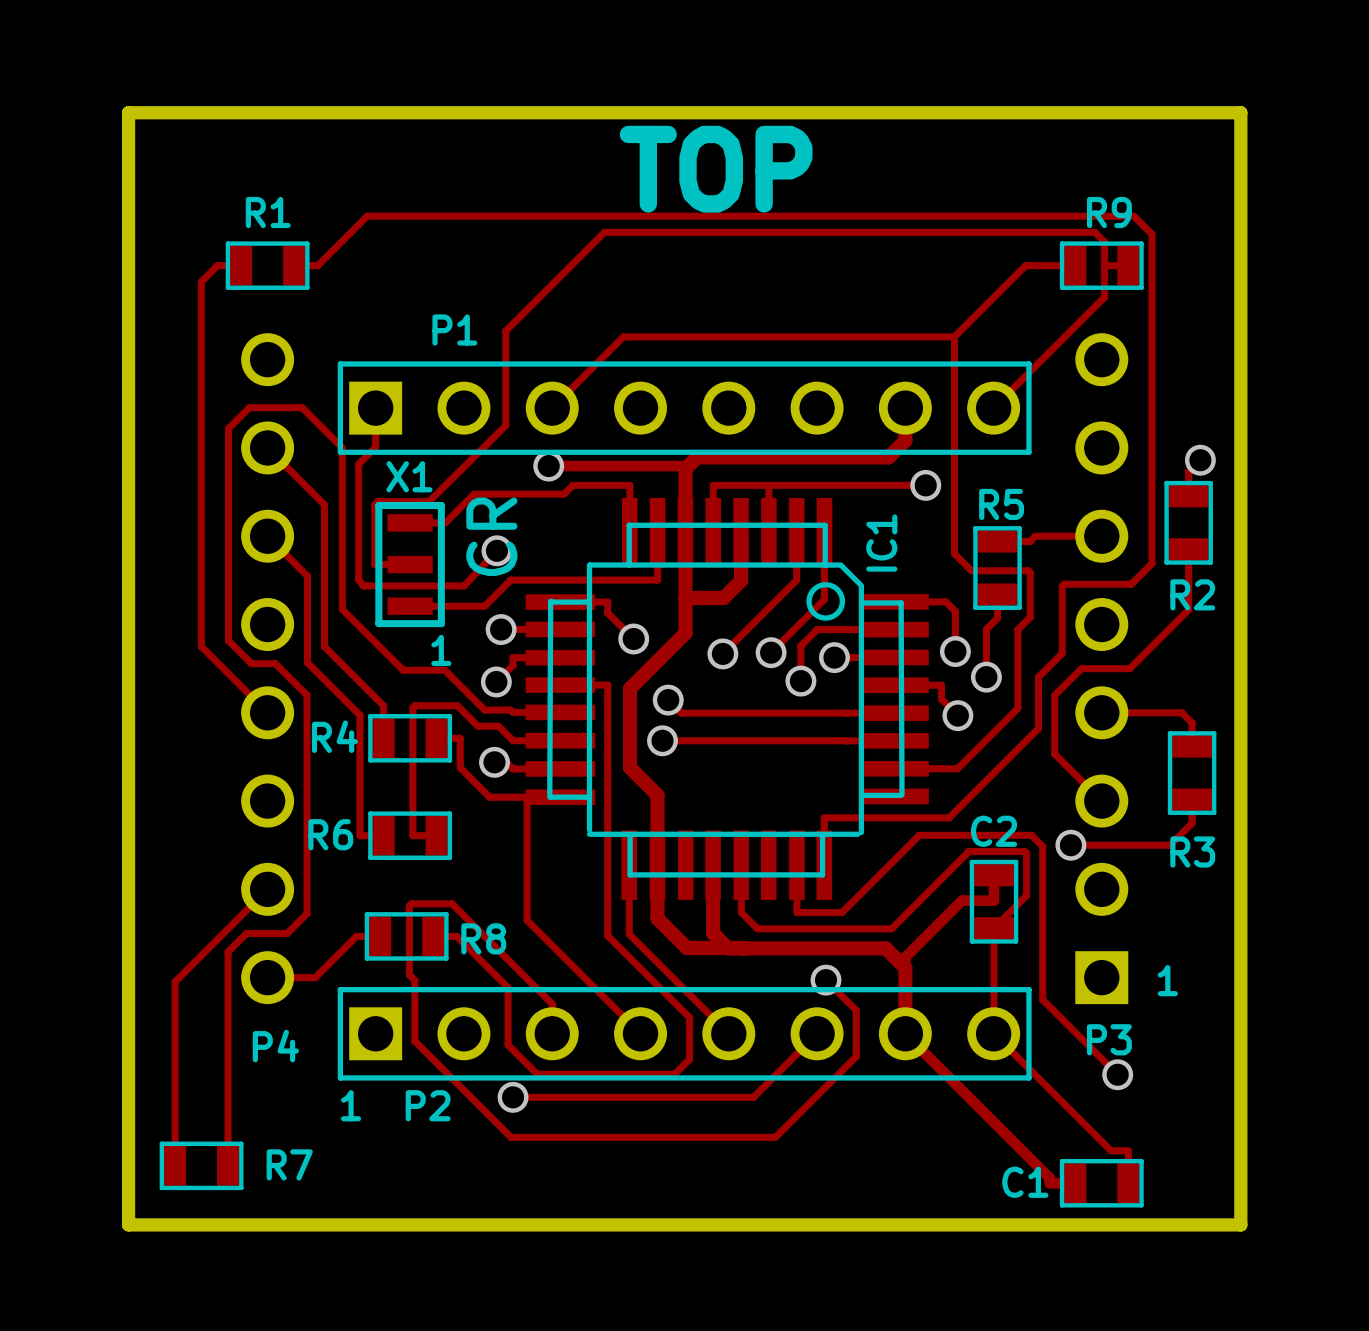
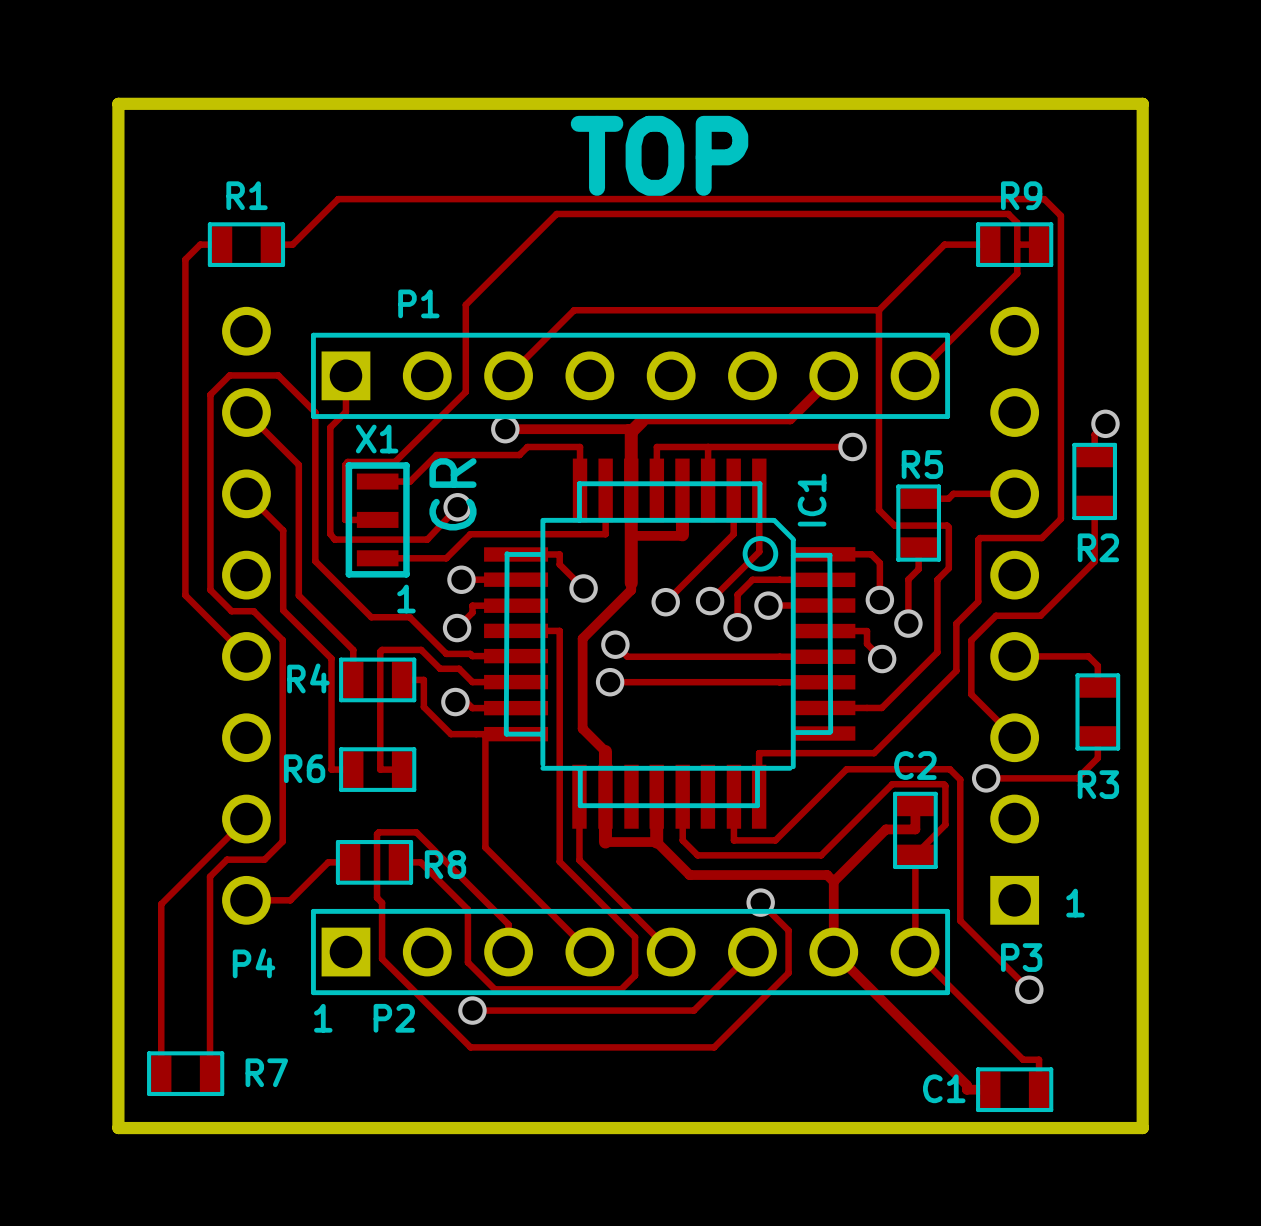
track: (905, 408) (905, 440) (888, 457) (697, 457) -> (833, 375) (790, 419) (643, 419) (641, 421)
track: (741, 580) (723, 598) (685, 598) -> (682, 534) (631, 535)
track: (685, 633) (630, 688) (630, 767) (657, 795) (657, 816) -> (631, 583) (631, 590) (582, 638) (582, 728) (605, 751)
track: (657, 914) (657, 918) (686, 947) (744, 947) -> (605, 842) (656, 842) (689, 875) (827, 875) (833, 881)
track: (713, 914) (713, 933) (728, 948) (885, 948) (905, 967) (905, 1033) -> none

